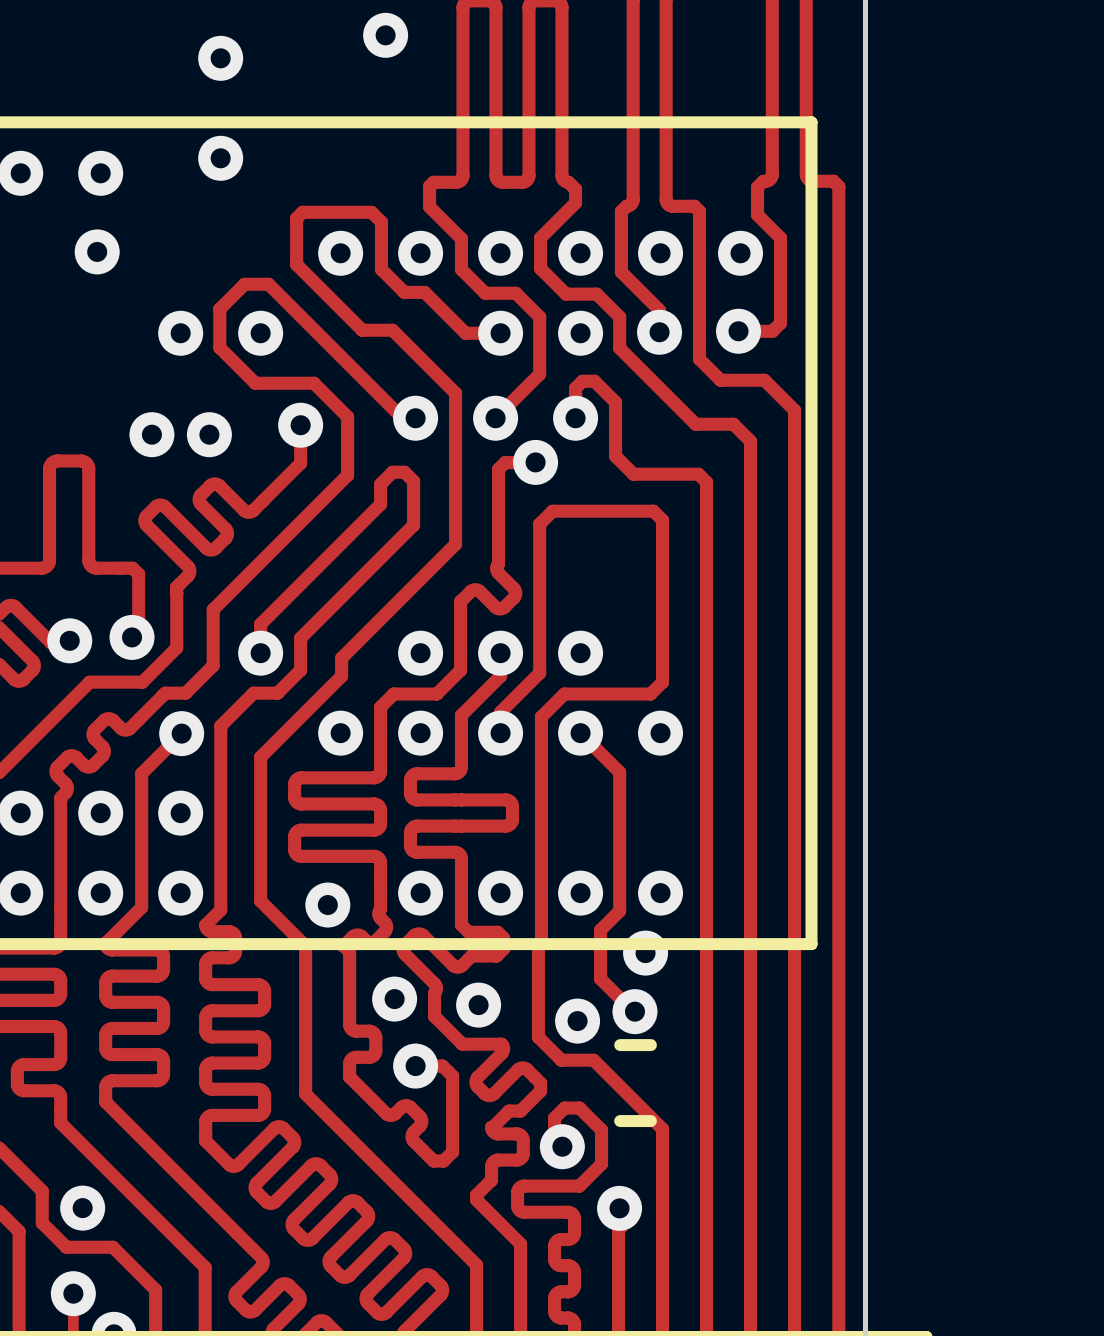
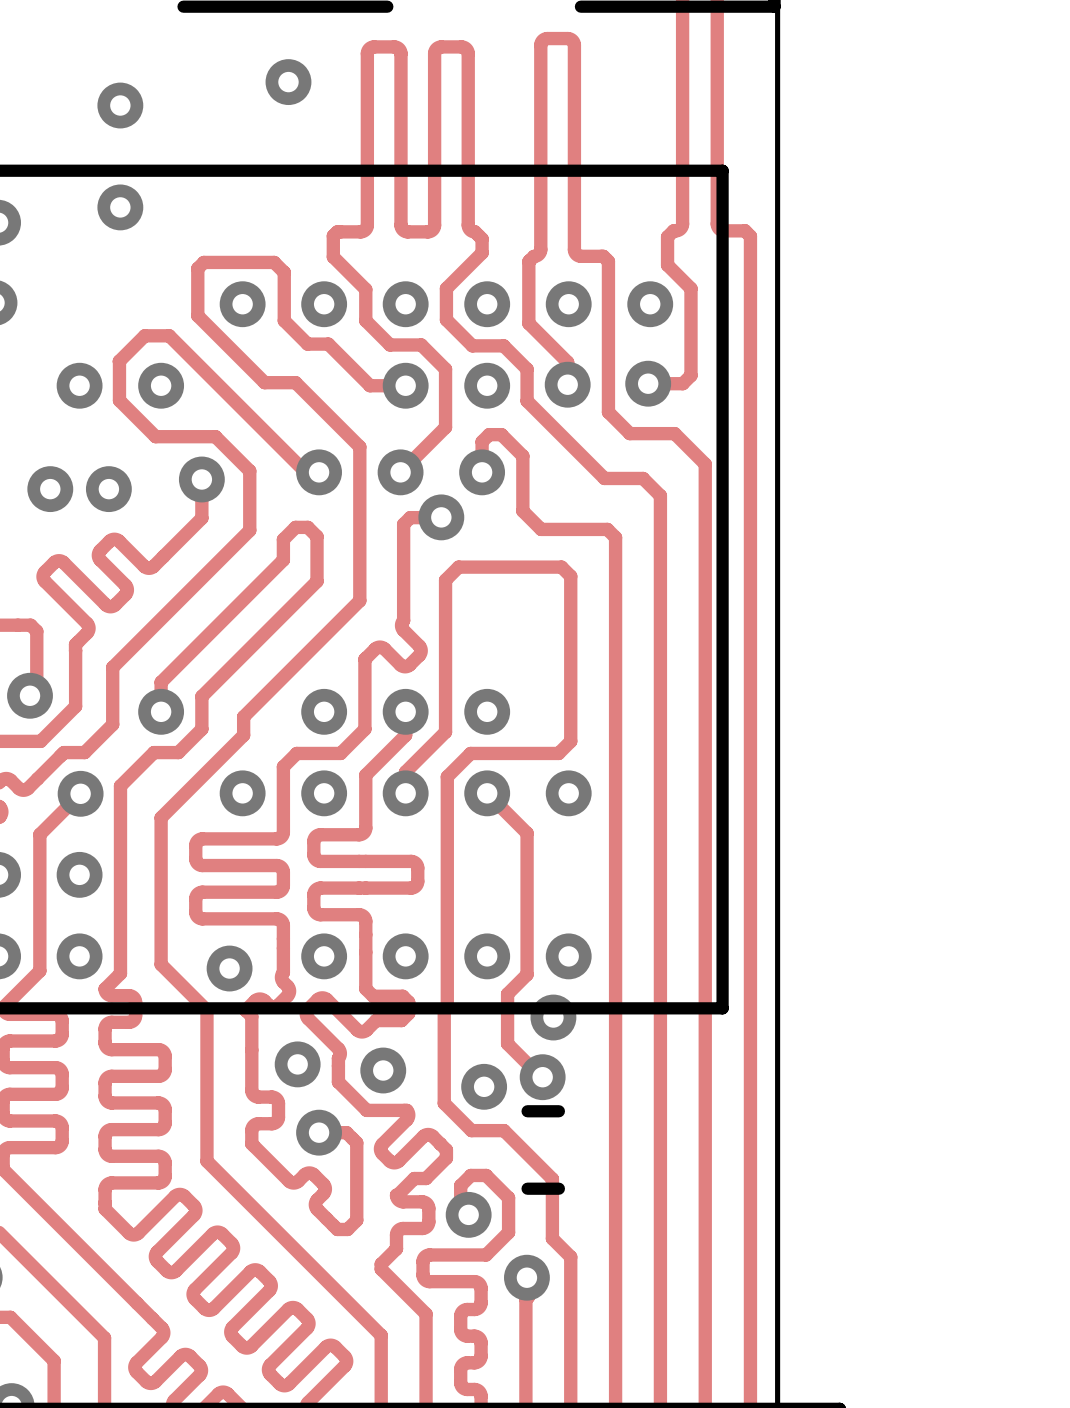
track: (561, 1060) (593, 1060) (662, 1129) (662, 1188) -> (467, 1126) (471, 1130) (504, 1130) (552, 1179) (552, 1238) (570, 1256)

